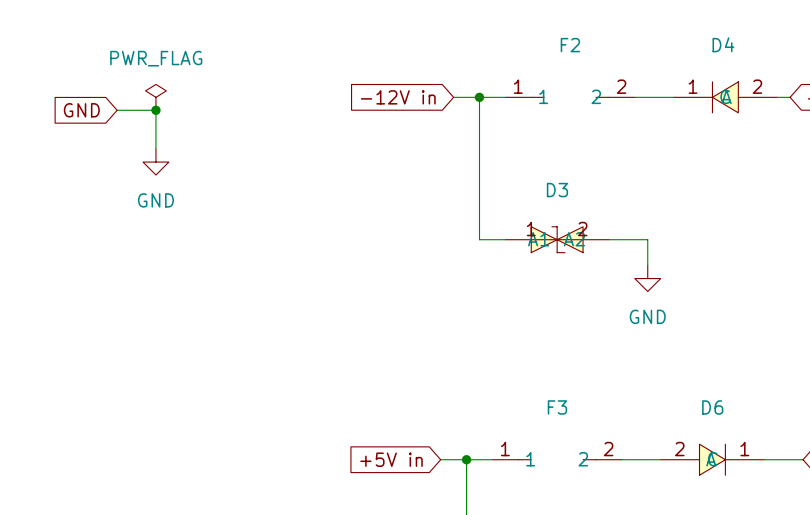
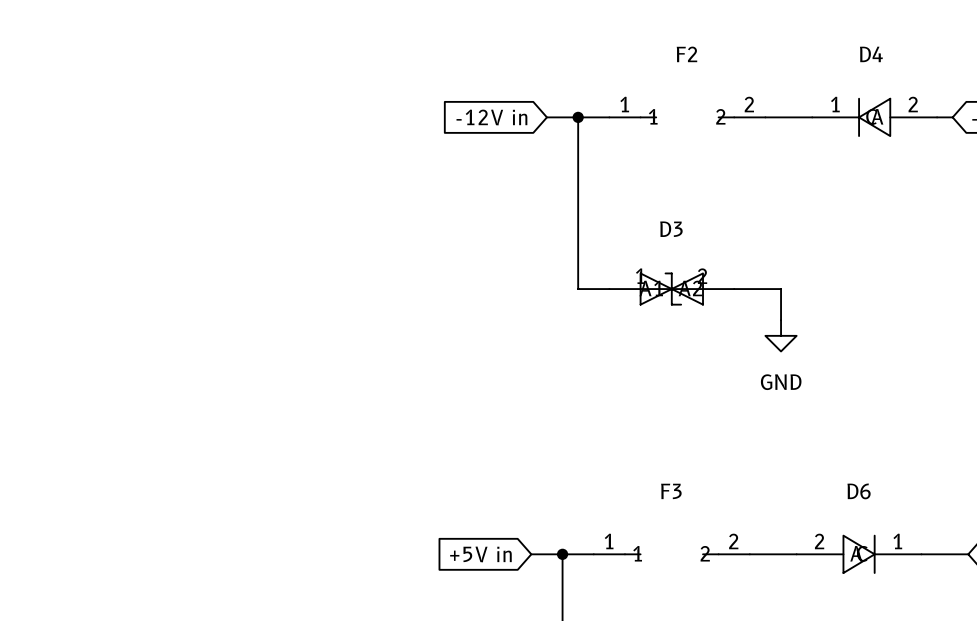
power symbol: PWR_FLAG (155, 97) -> none
global label: GND (81, 110) -> none
wire: (117, 110) (155, 110) (155, 149) -> none
junction: (155, 110) -> none
power symbol: GND (155, 162) -> none

